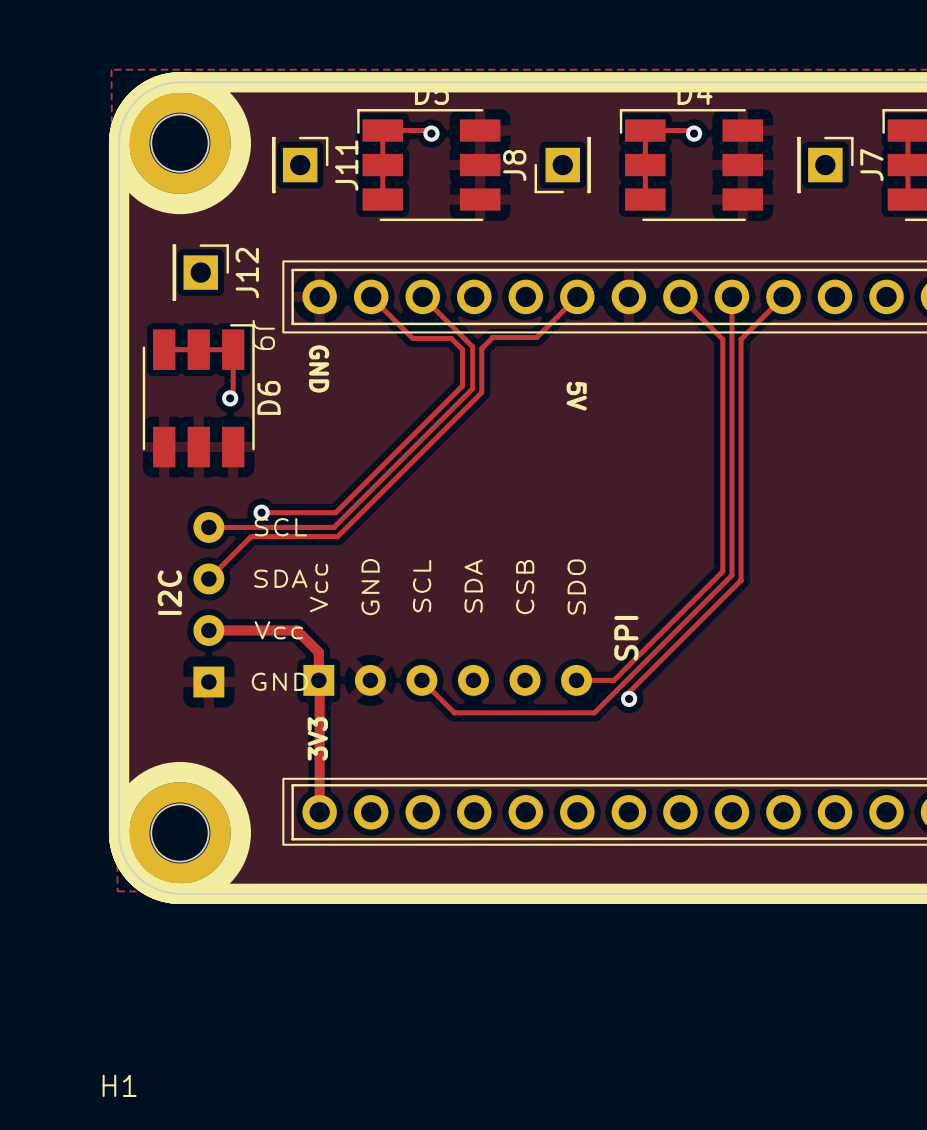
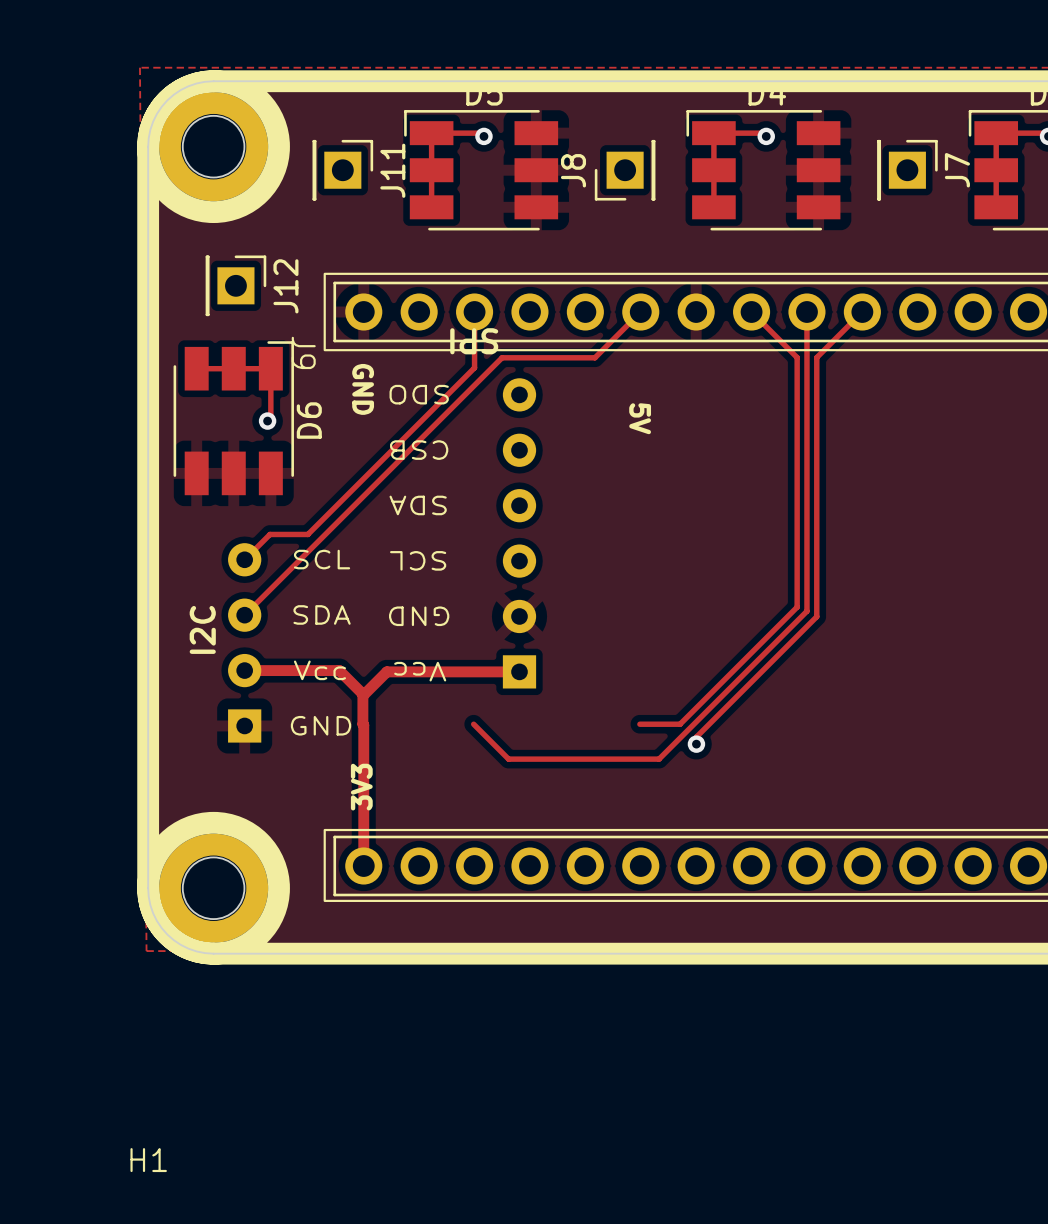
track: (371, 296) (412, 338) (451, 338) (462, 349) (462, 385) (335, 512) (261, 512) -> none
track: (422, 296) (472, 346) (472, 388) (333, 527) (208, 527) -> (474, 312) (474, 367) (307, 534) (269, 534) (244, 559)
track: (536, 337) (492, 337) (481, 348) (481, 392) (337, 536) (251, 536) -> (597, 355) (594, 357) (502, 357) (290, 569)
via: (261, 512) -> none
track: none -> (519, 671) (386, 671) (363, 695)
part rotation: 0° (447, 680) -> 90° counterclockwise (519, 533)
part position: (447, 680) -> (519, 533)

